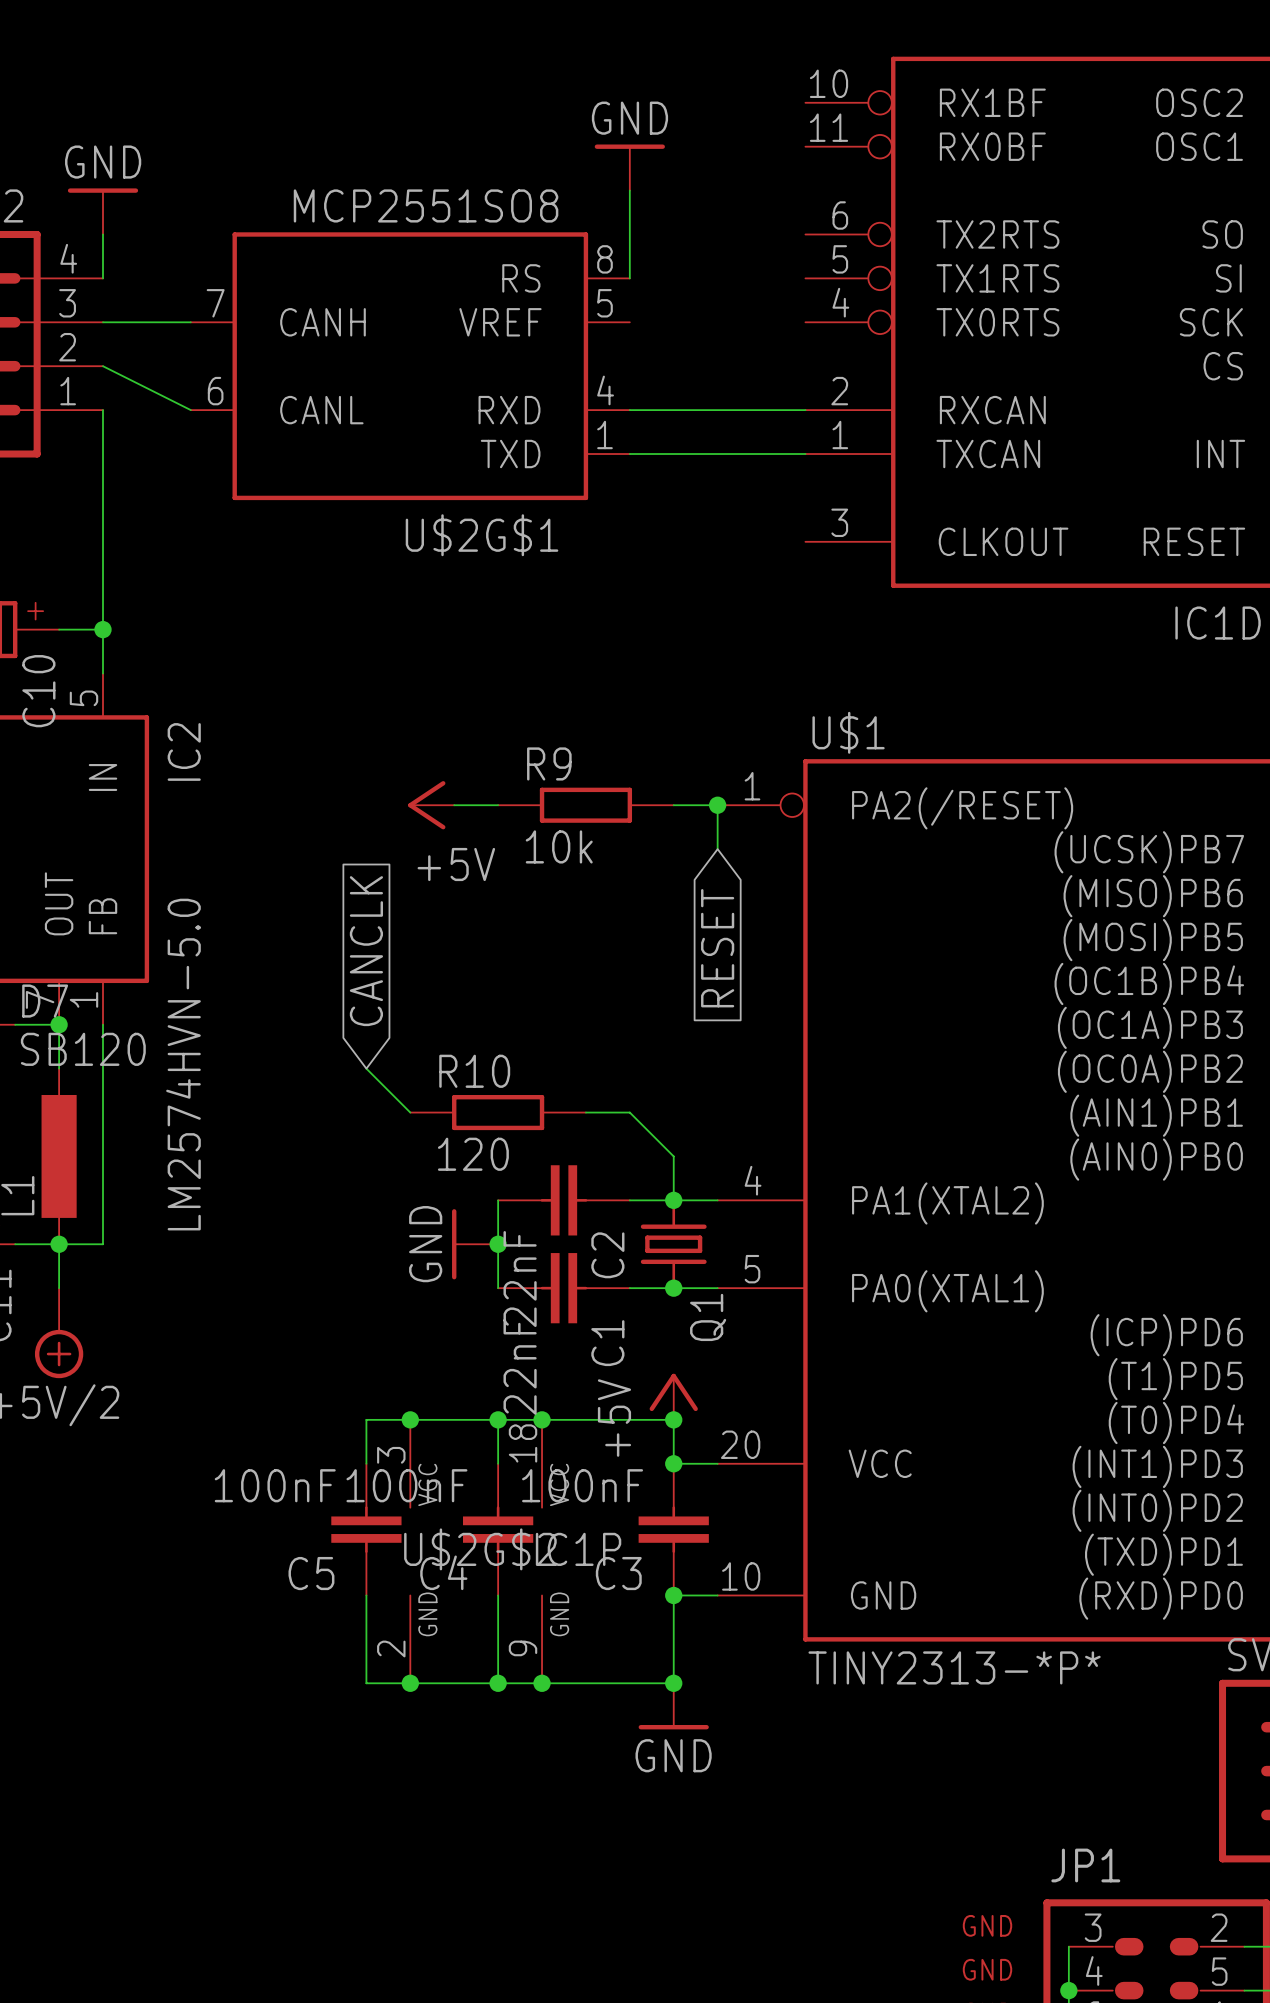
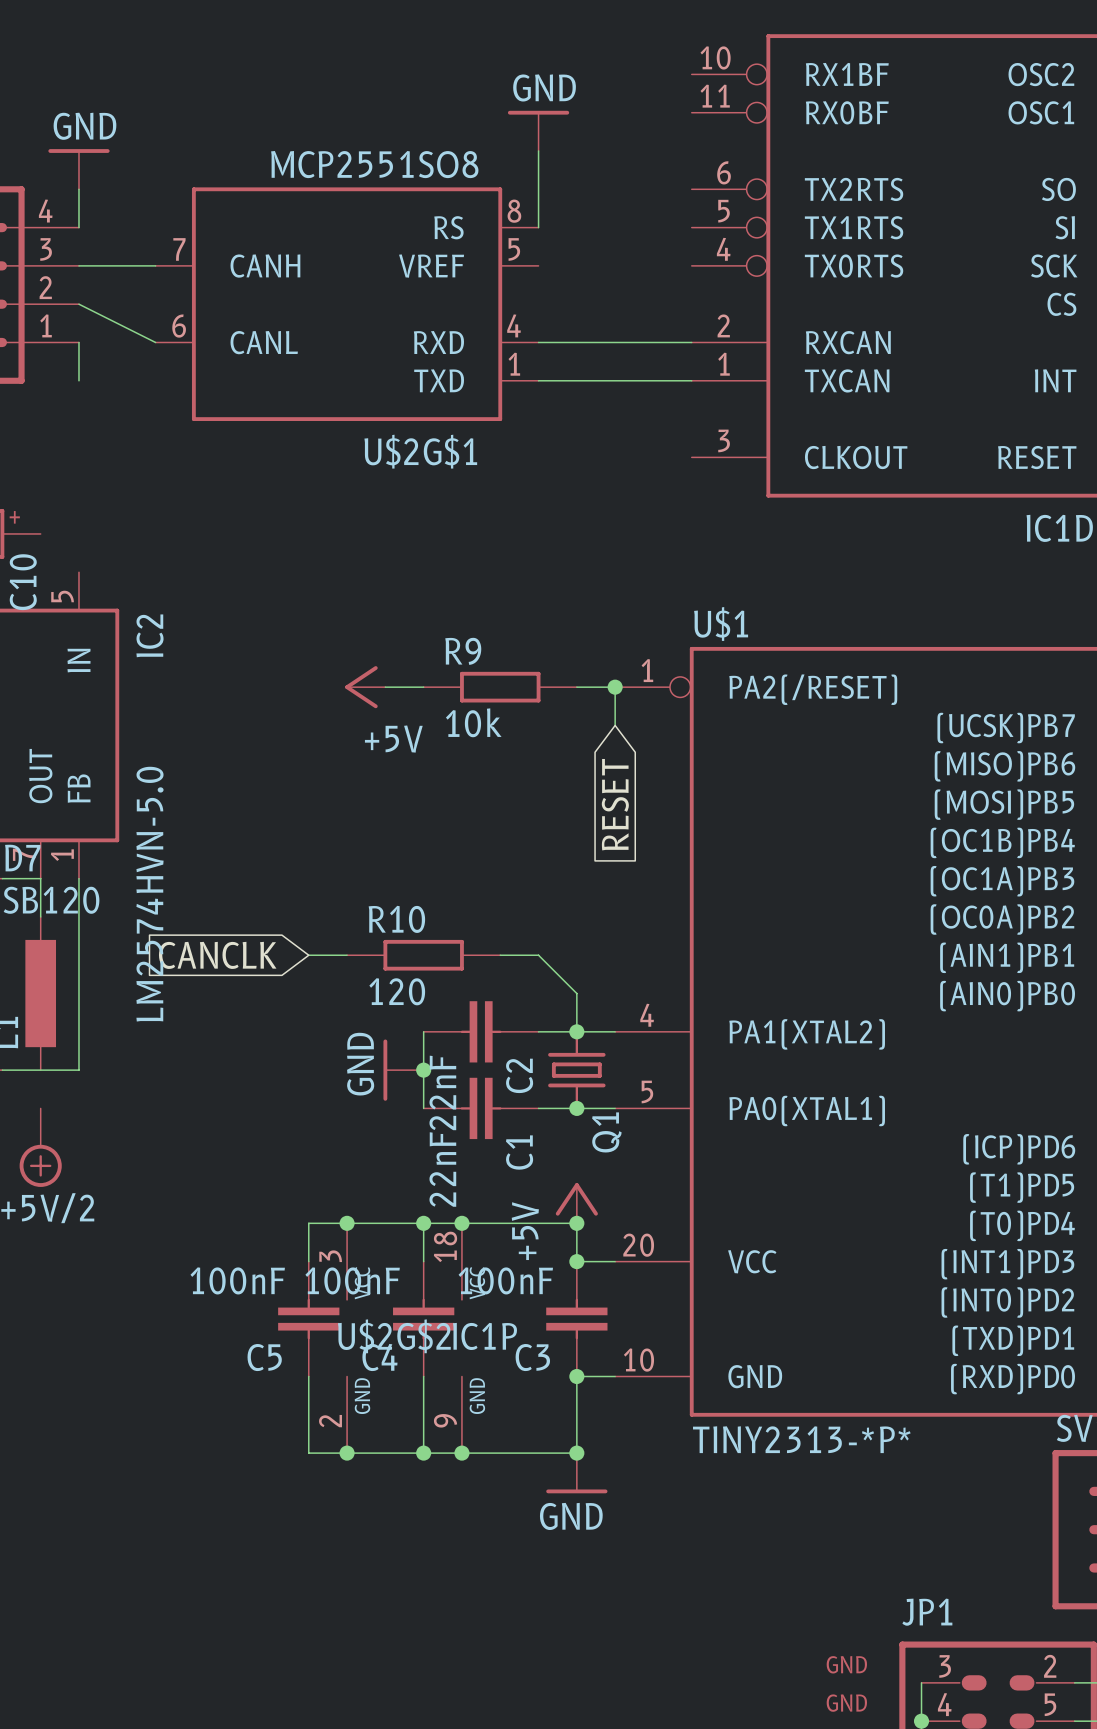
wire: (103, 454) (103, 673) -> none
wire: (59, 629) (103, 629) -> none
junction: (103, 629) -> none
global label rotation: 0° (366, 951) -> 90° counterclockwise (217, 955)
junction: (59, 1024) -> none
wire: (366, 1068) (410, 1112) -> (308, 955) (347, 955)
wire: (59, 1244) (59, 1288) -> none
junction: (59, 1244) -> none

